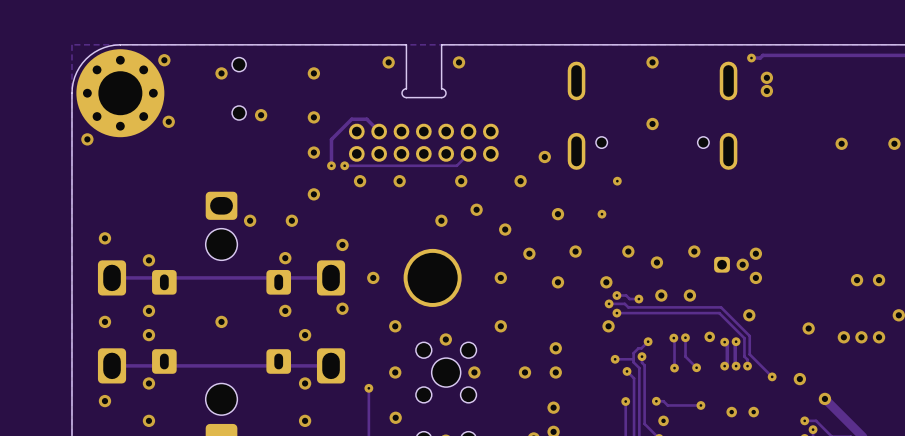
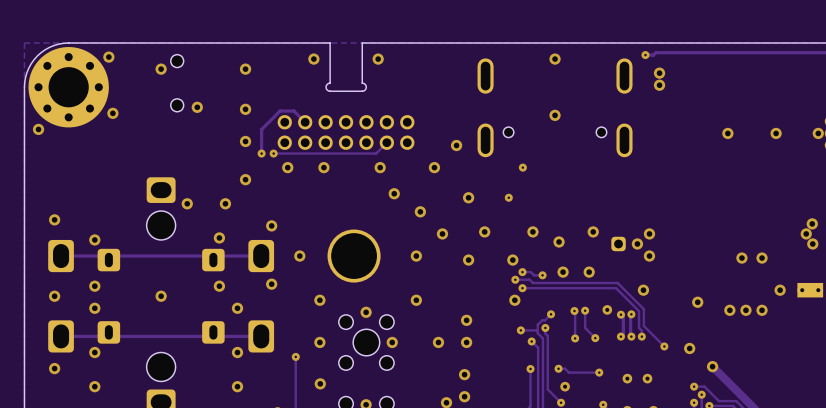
via: (441, 220) -> none

